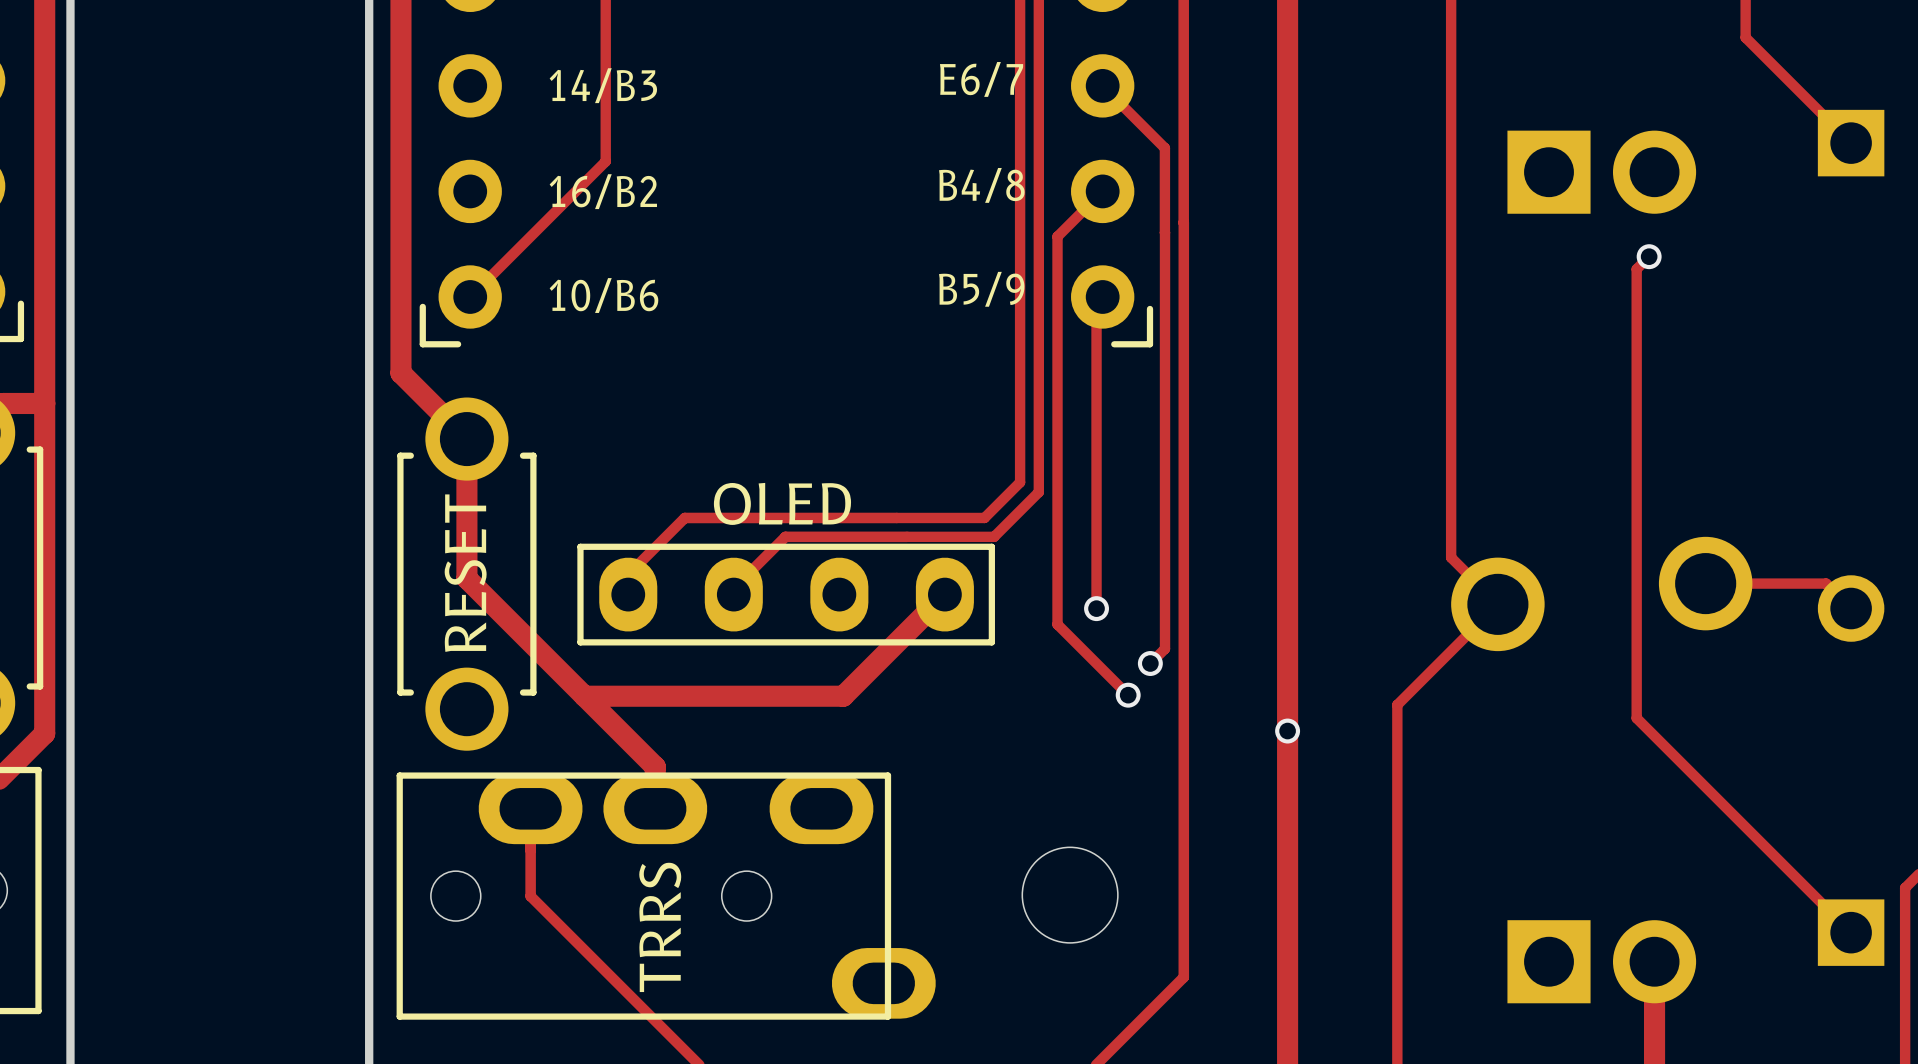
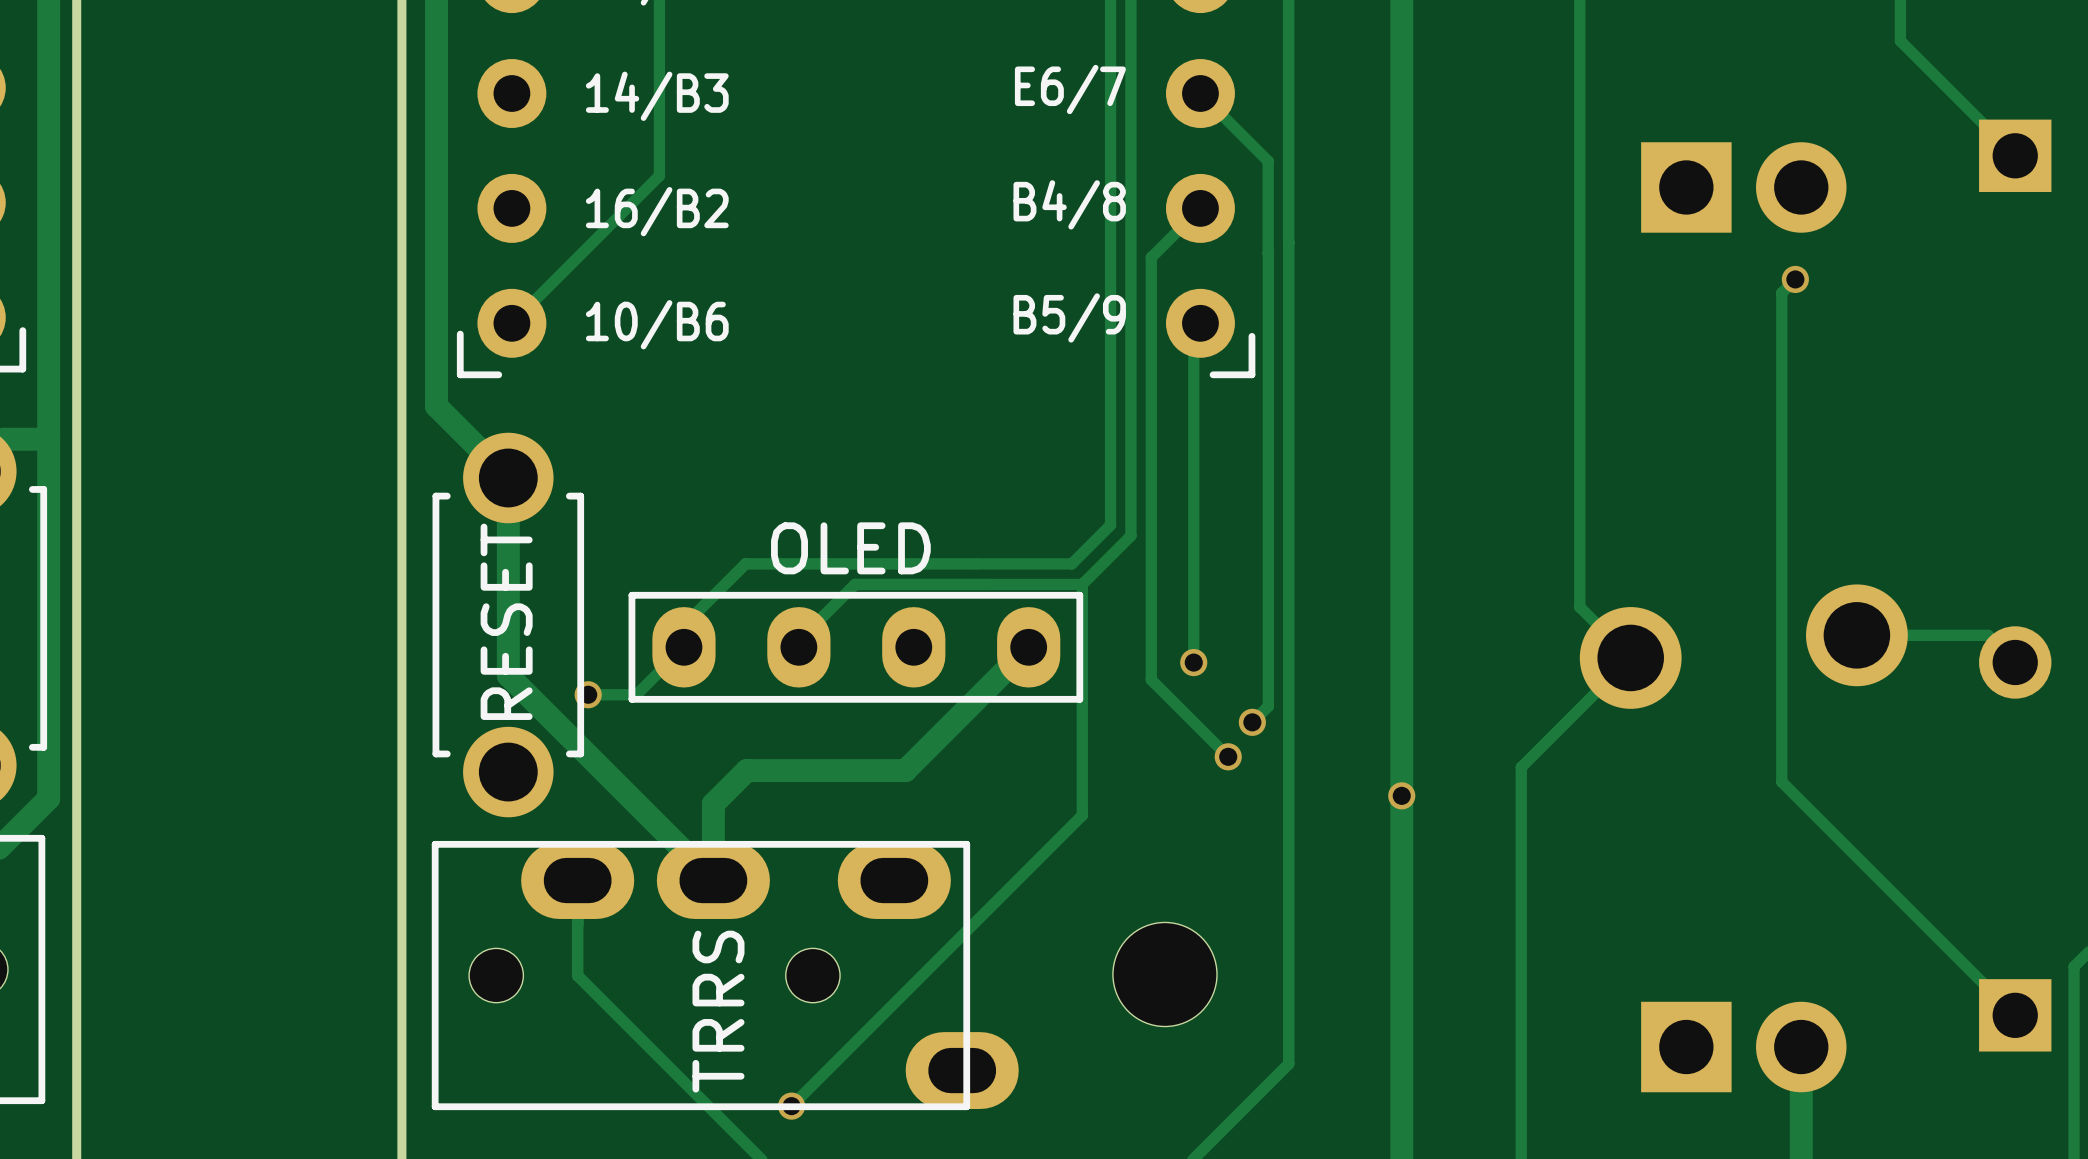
track: none -> (1082, 584) (1082, 815) (791, 1106)
track: (466, 578) (655, 766) -> (508, 629) (508, 675) (713, 880)
track: none -> (683, 647) (636, 694) (588, 694)
via: none -> (588, 694)
track: (584, 696) (843, 696) -> (713, 834) (713, 803) (746, 770) (905, 770) (918, 757)
via: none -> (791, 1106)

